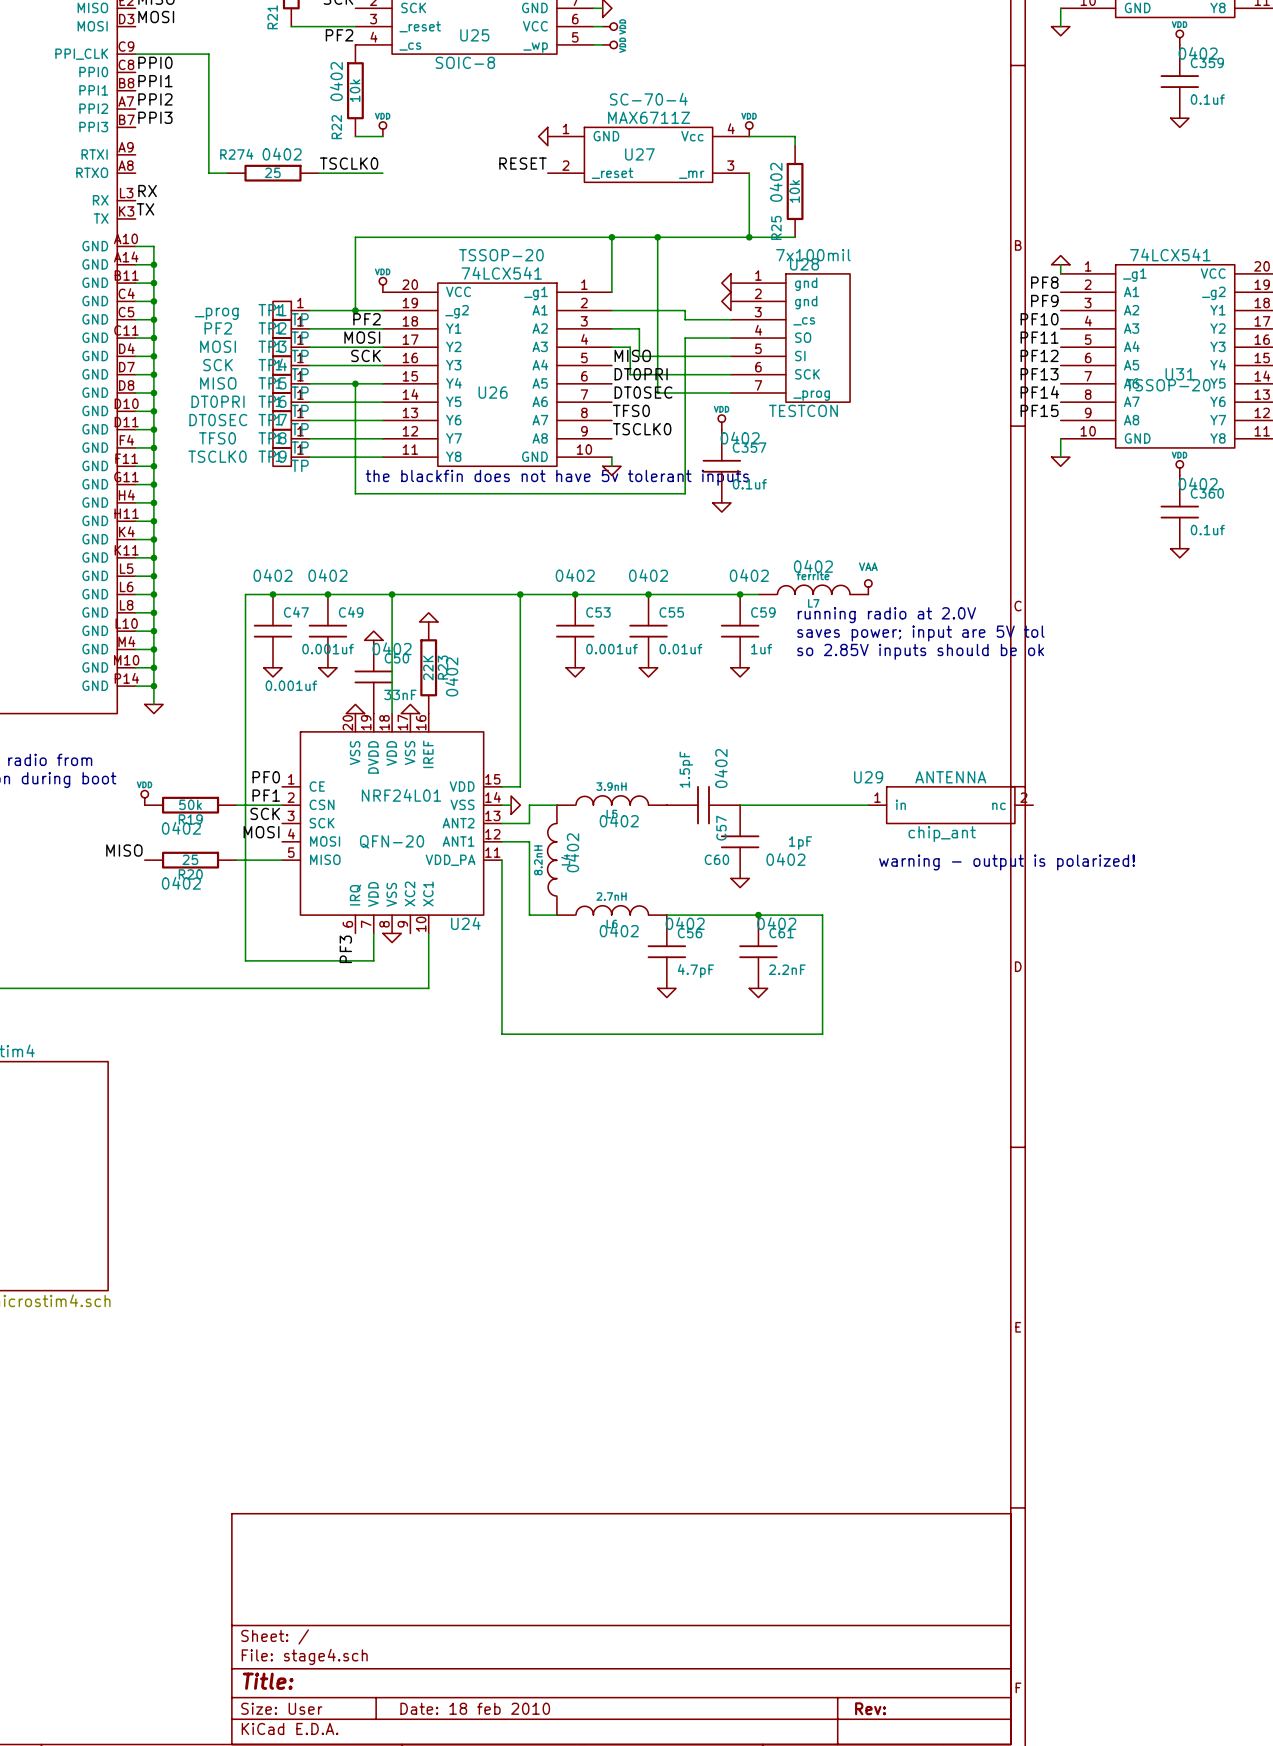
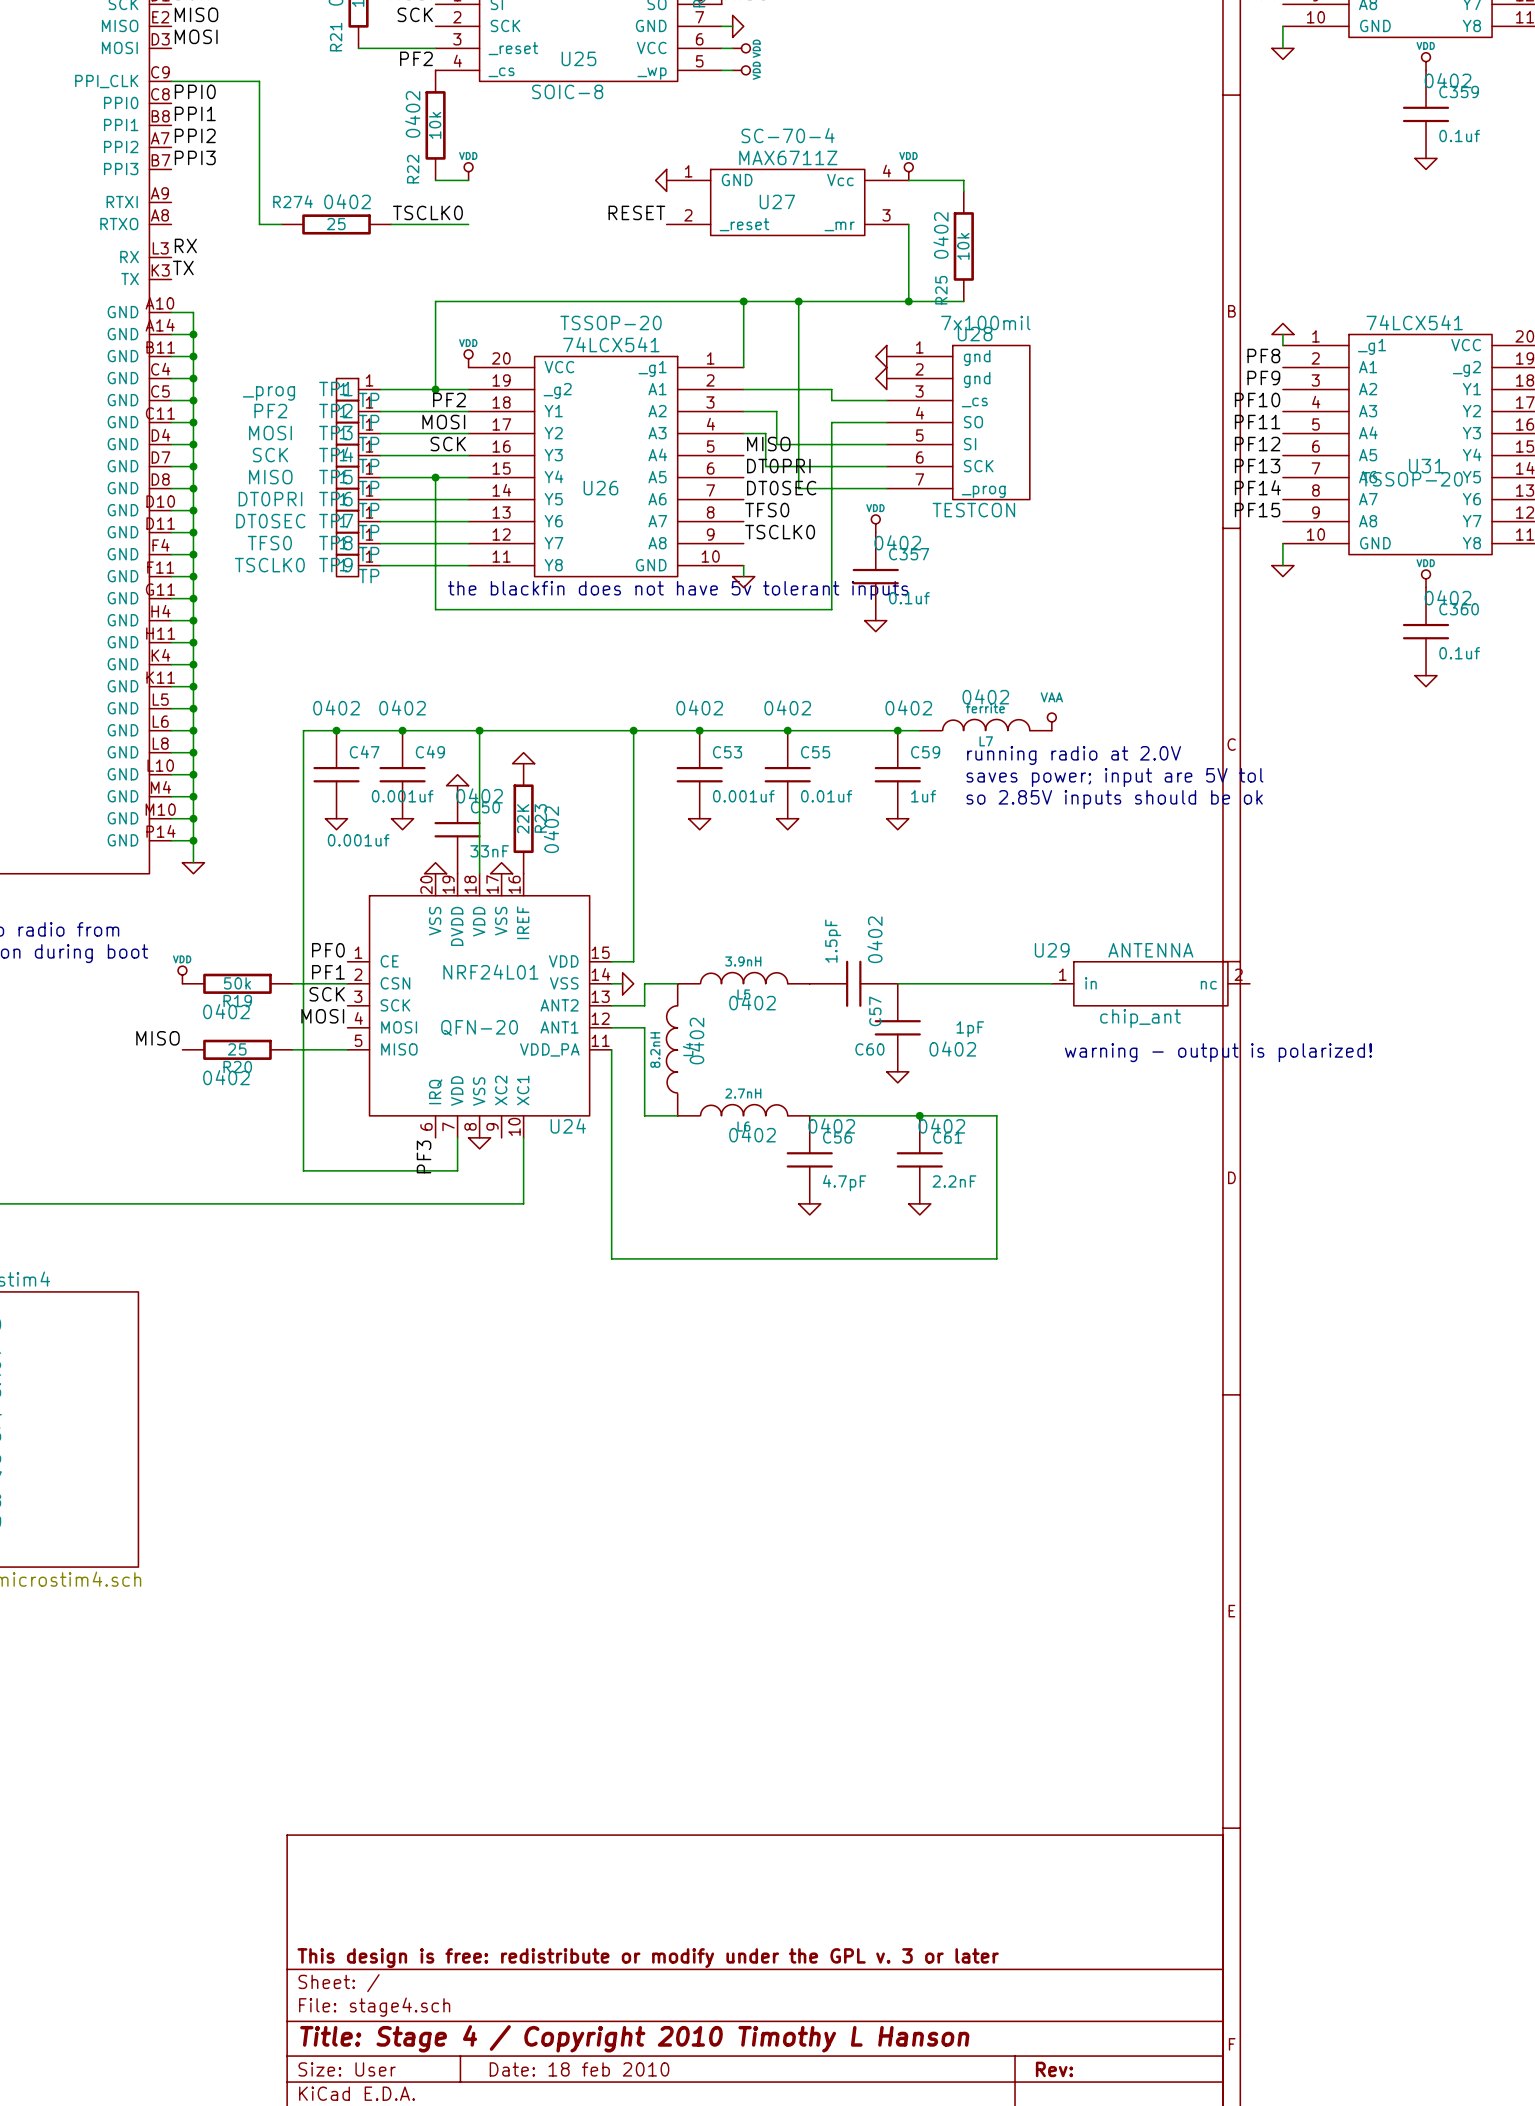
title block: none -> This design is free: redistribute or modify under the GPL v. 3 or later (648, 1958)
title block: Title: (268, 1681) -> Title: Stage 4 / Copyright 2010 Timothy L Hanson (634, 2038)

